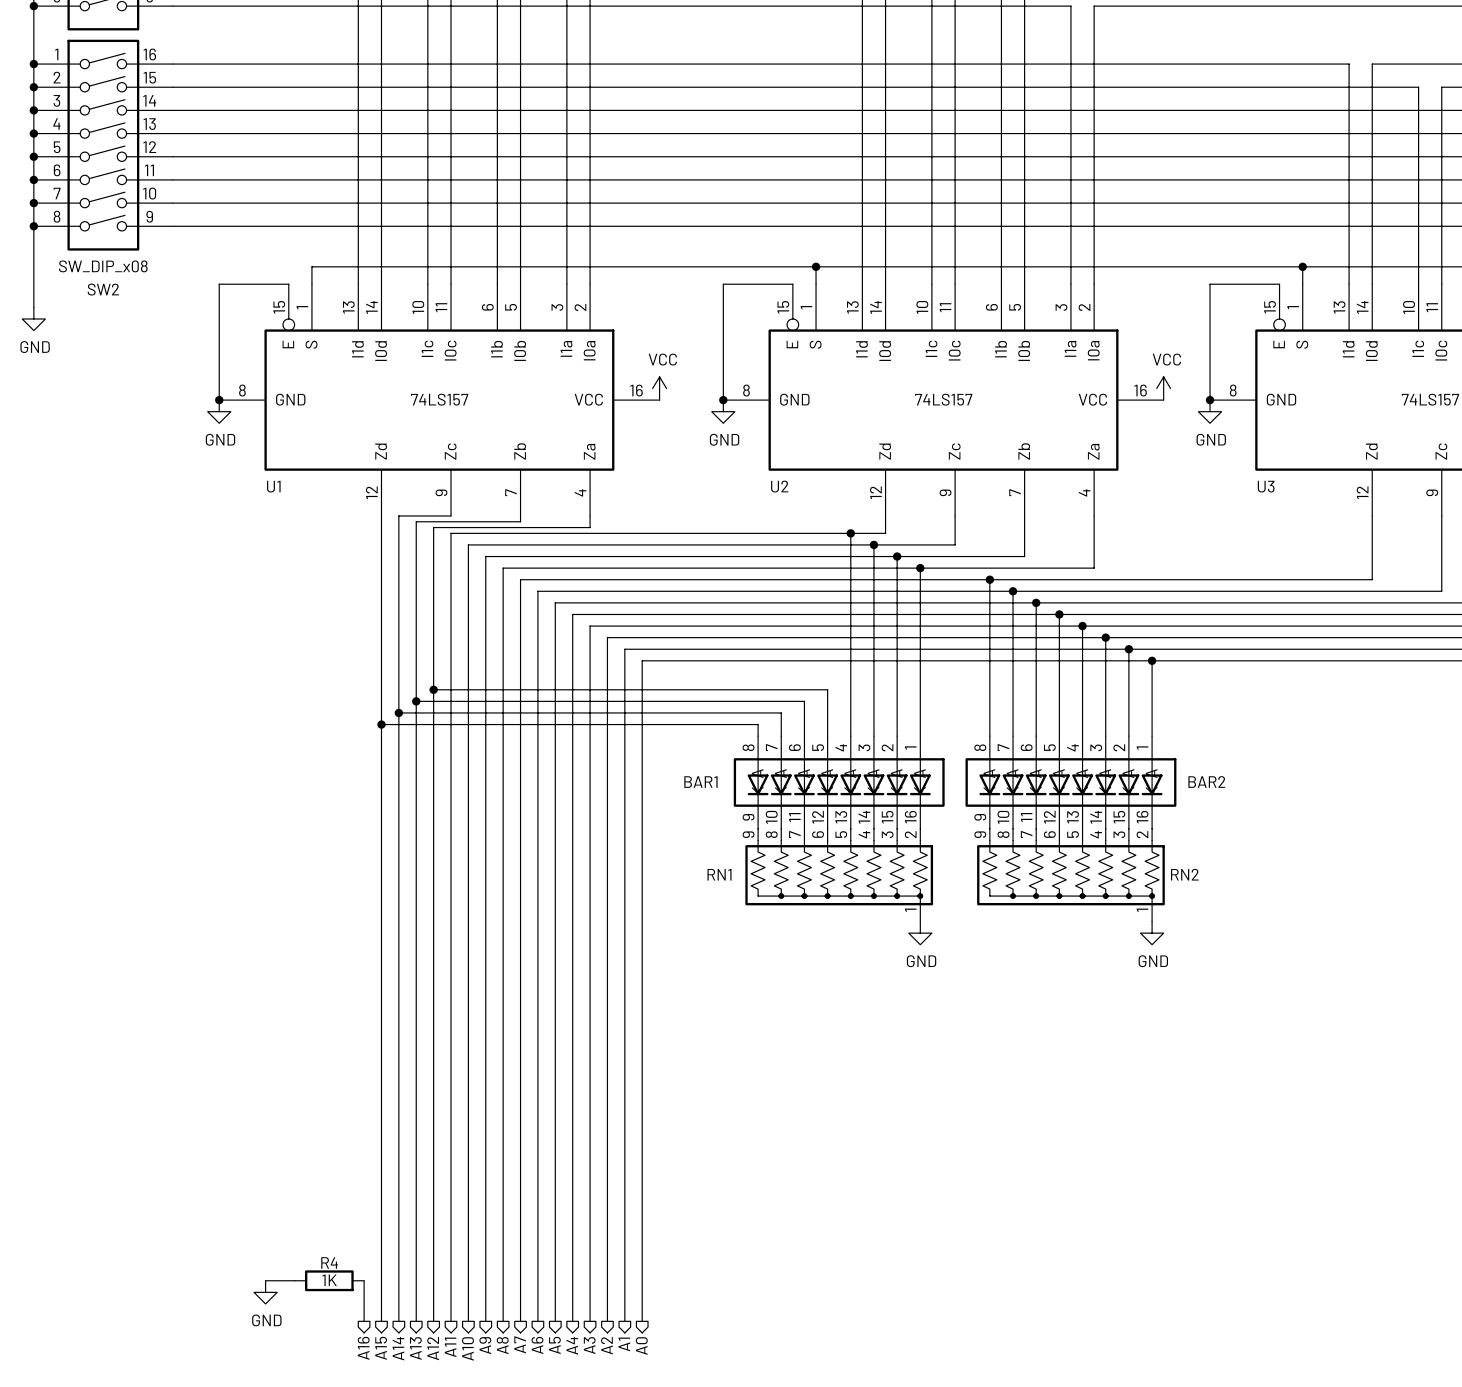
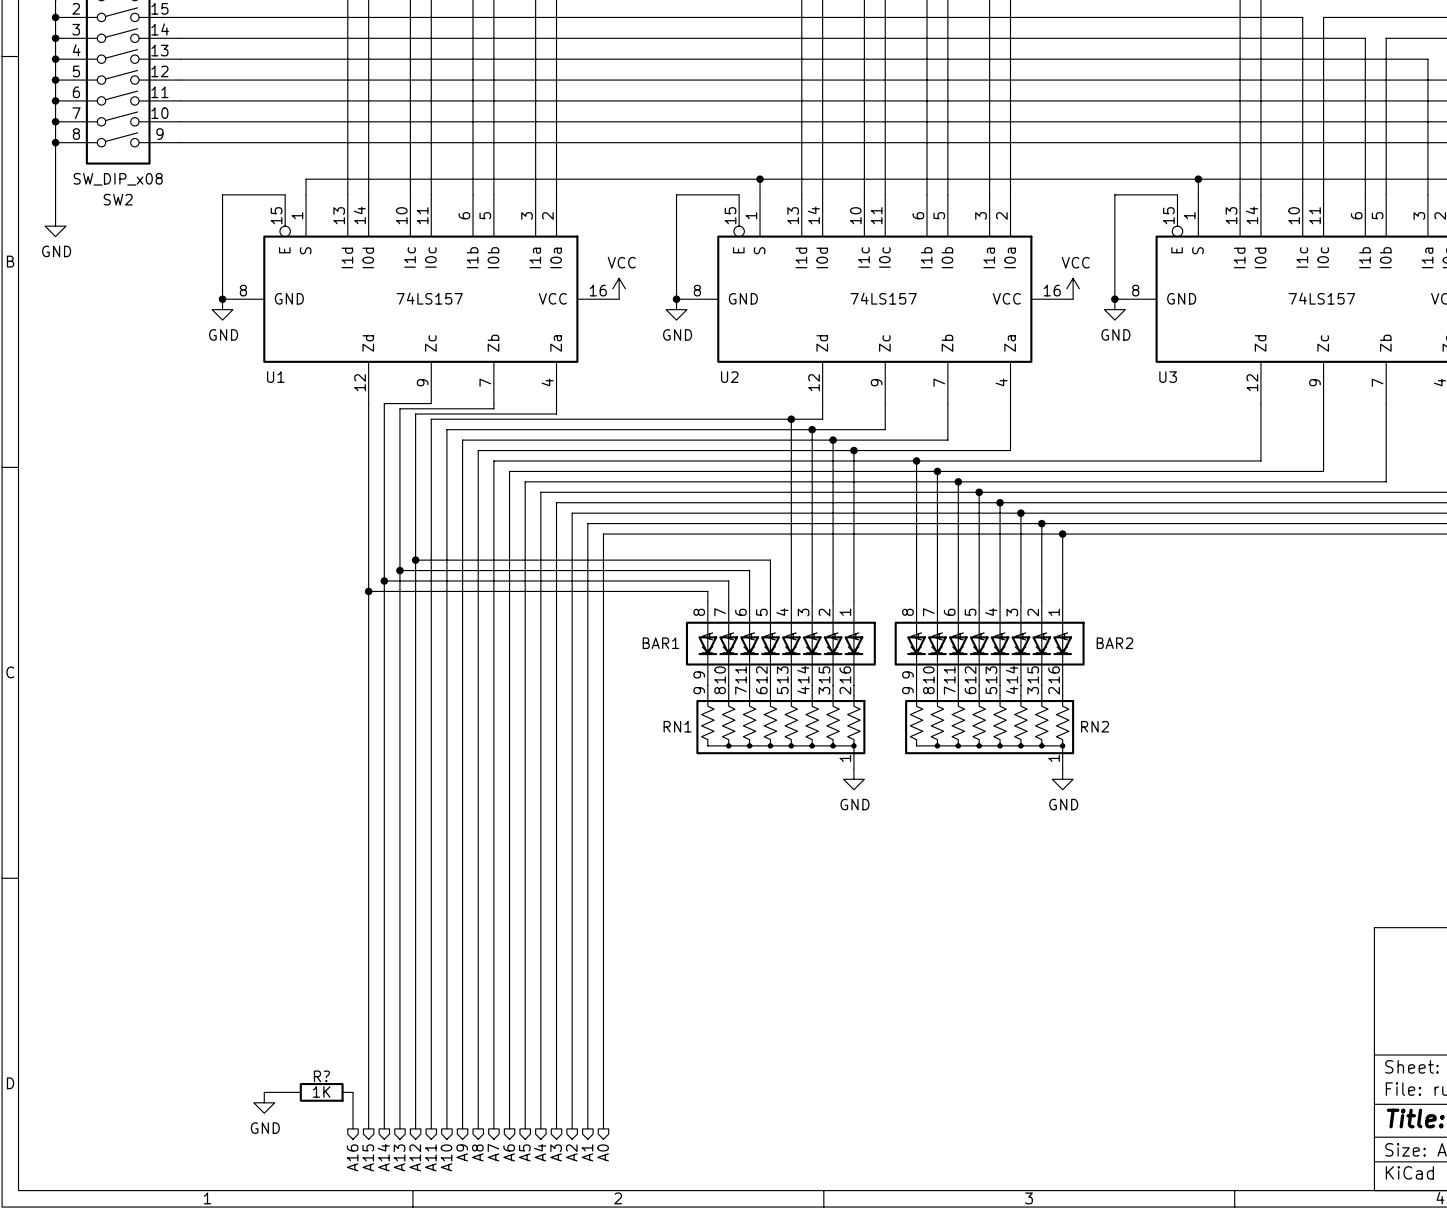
R4 name: R4 (329, 1262) -> R? (321, 1076)

